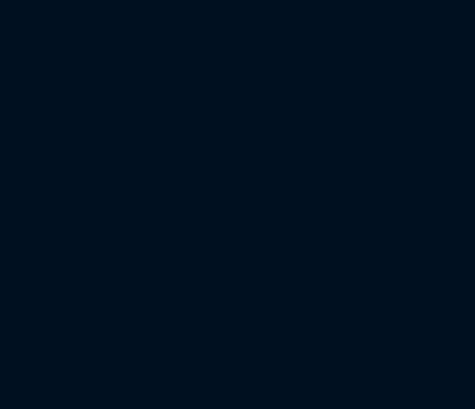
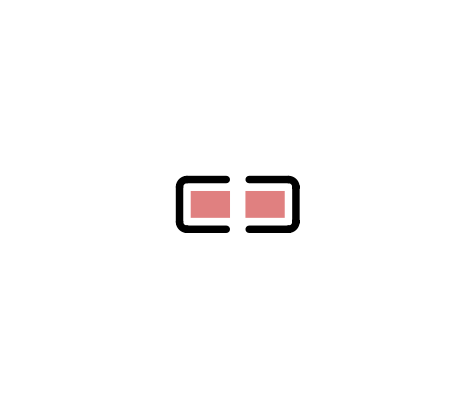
part: none -> (237, 204)

